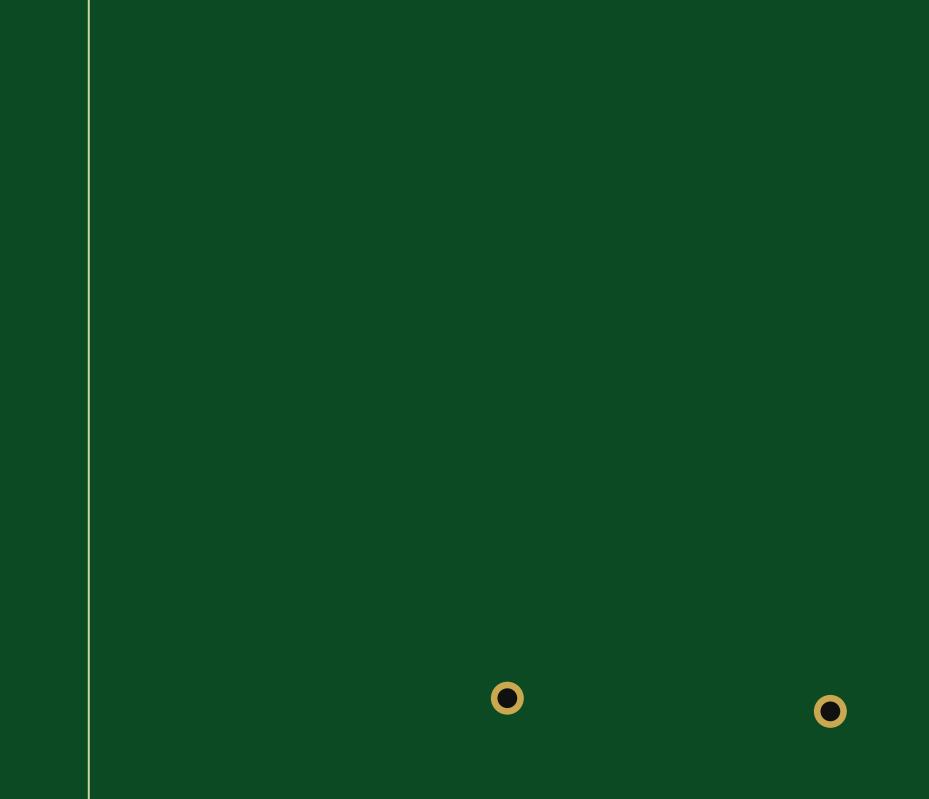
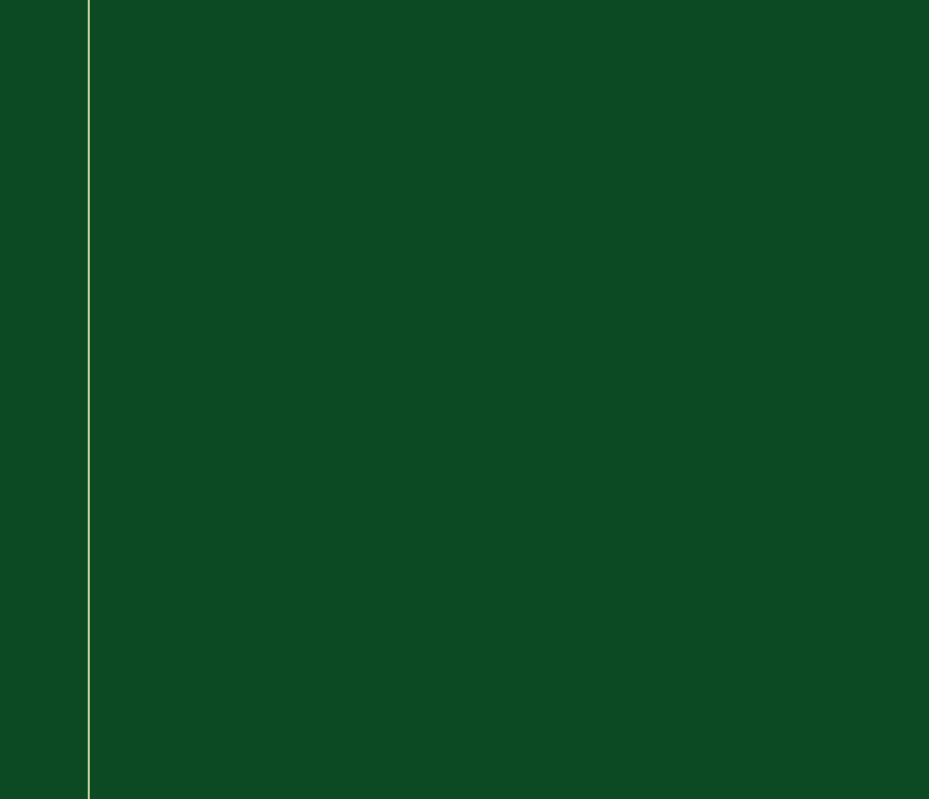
via: (507, 698) -> none
via: (830, 711) -> none

